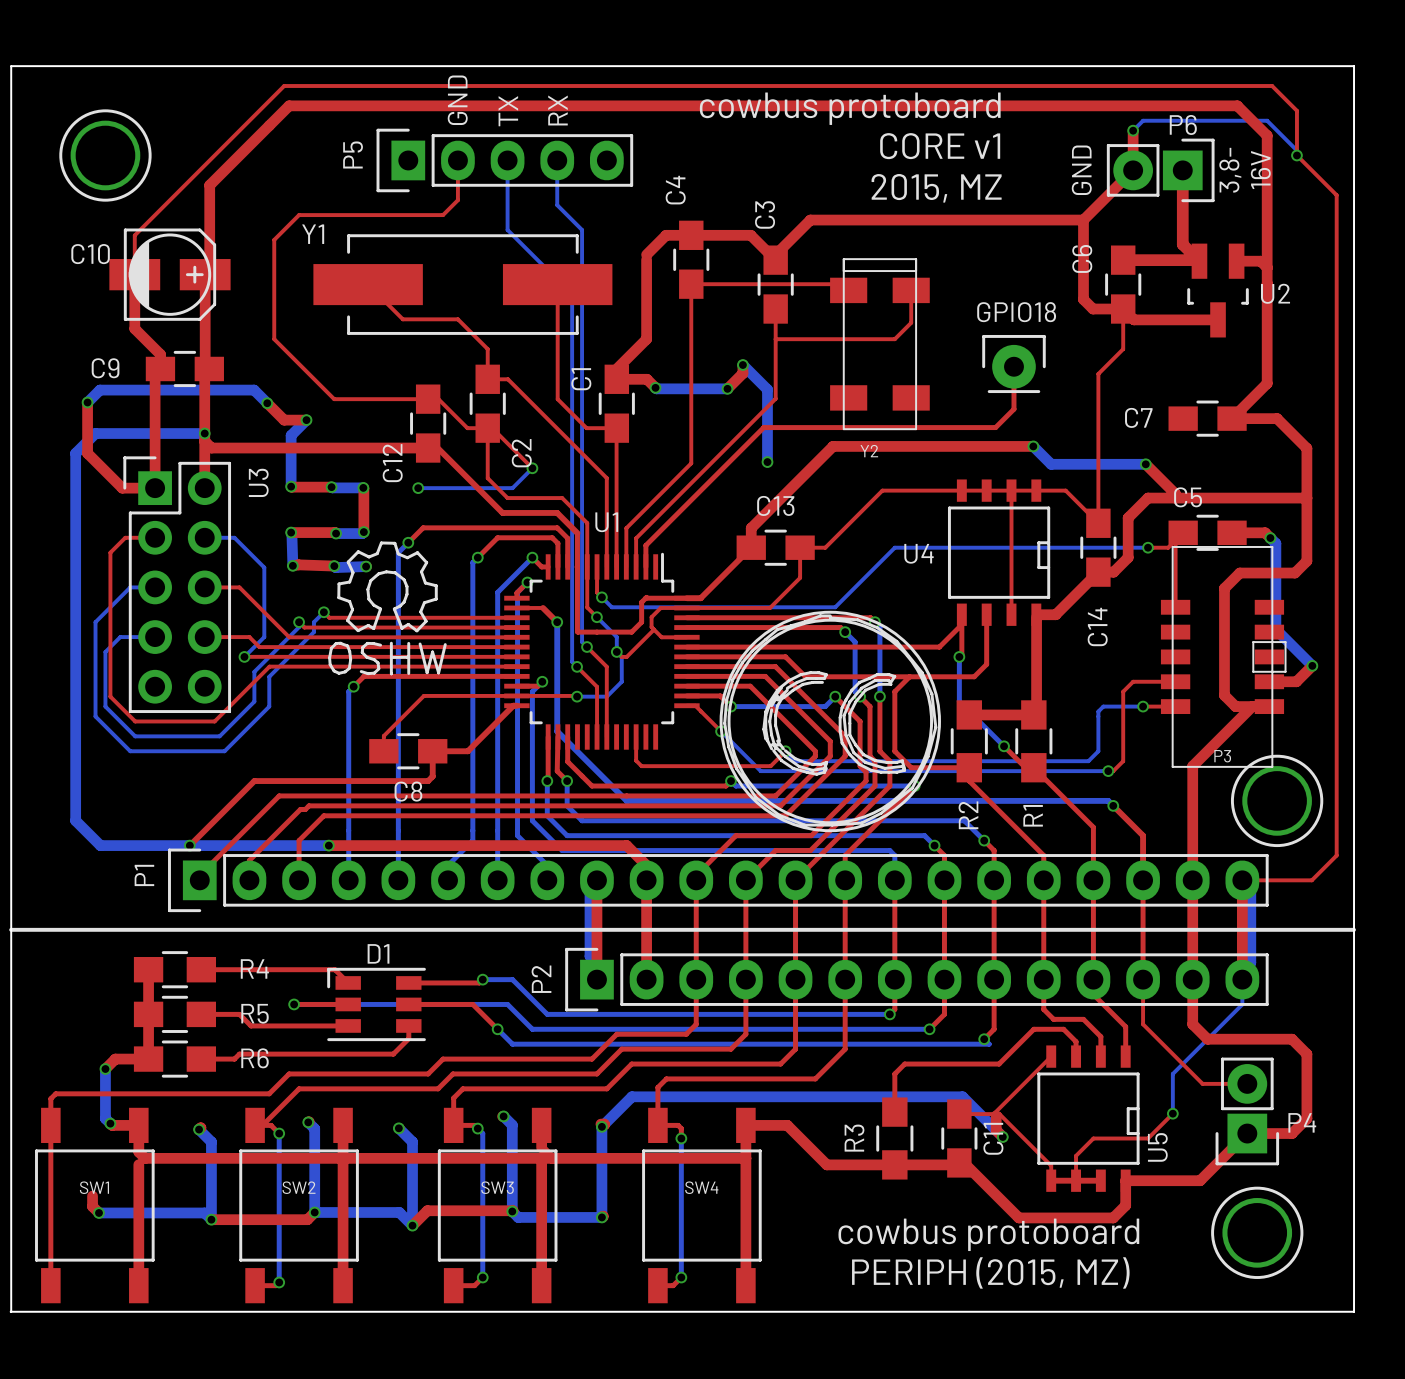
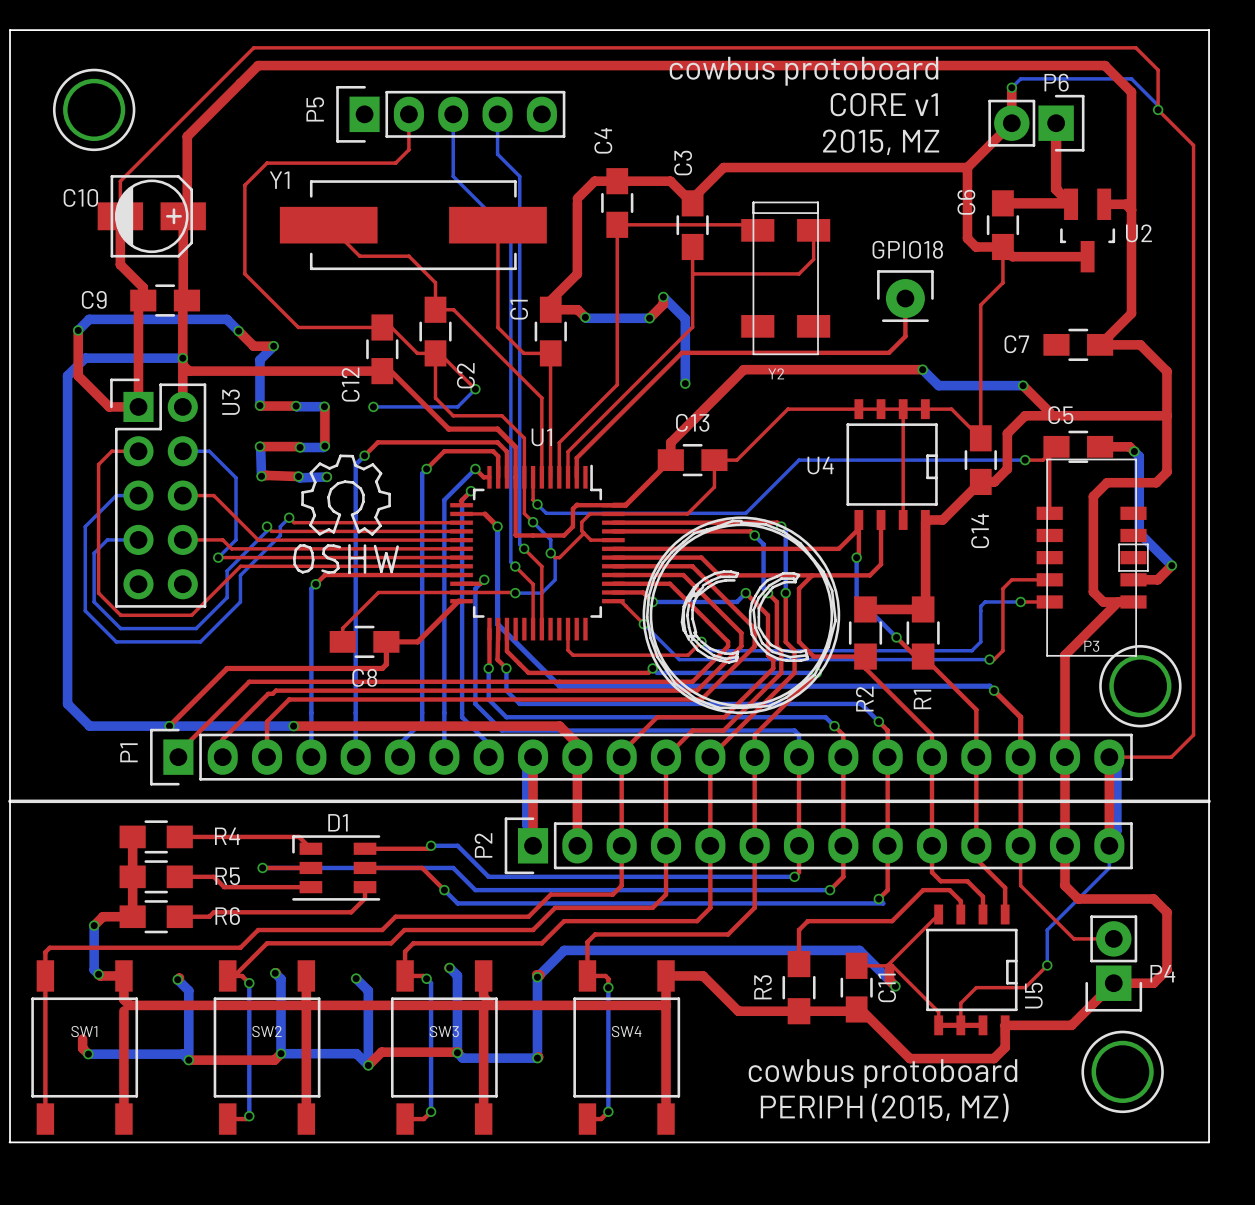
text: GND (457, 100) -> none
text position: cowbus protoboard (850, 108) -> cowbus protoboard (803, 71)
text: RX (557, 110) -> none
text: TX (508, 111) -> none
text position: CORE v1 (940, 146) -> CORE v1 (884, 104)
text: GND (1081, 170) -> none
text: 3,8- (1230, 170) -> none
text: 16V (1260, 170) -> none
text position: 2015, MZ (936, 188) -> 2015, MZ (881, 142)

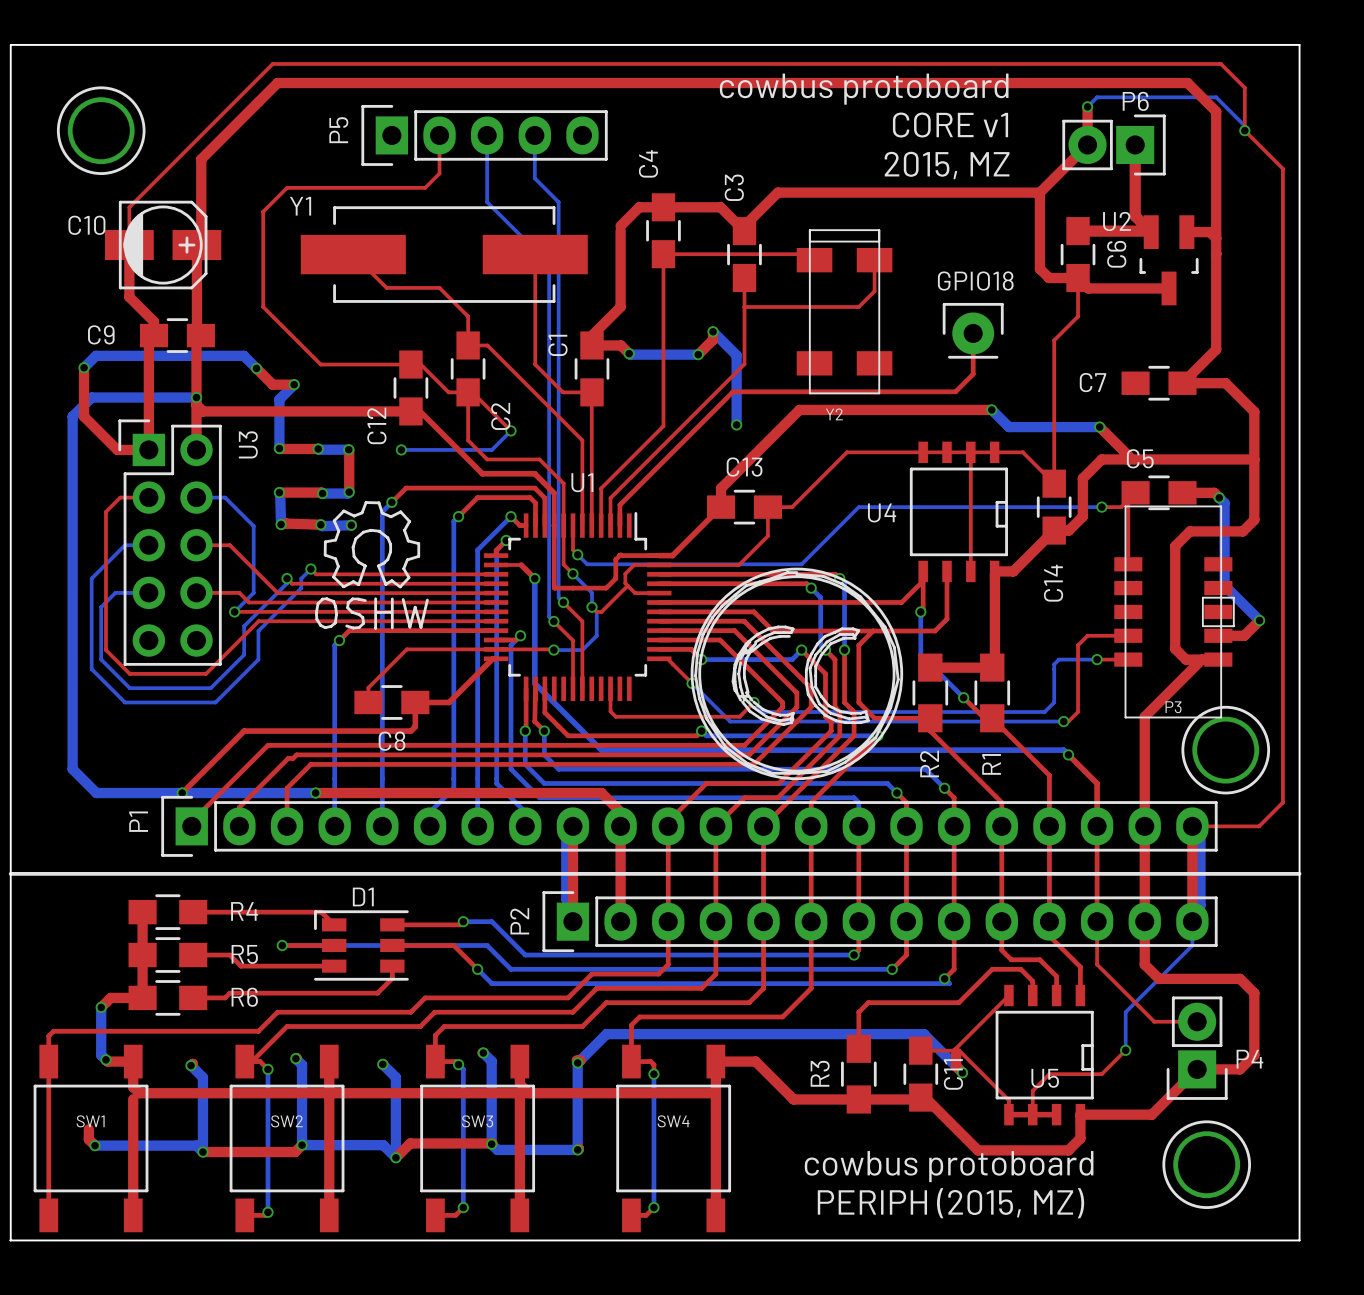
C6 name position: C6 (966, 202) -> C6 (1116, 254)
U2 name position: U2 (1138, 233) -> U2 (1117, 221)
U5 name rotation: 0° (1033, 995) -> 90° clockwise (1045, 1078)
U5 name position: U5 (1033, 995) -> U5 (1045, 1078)

